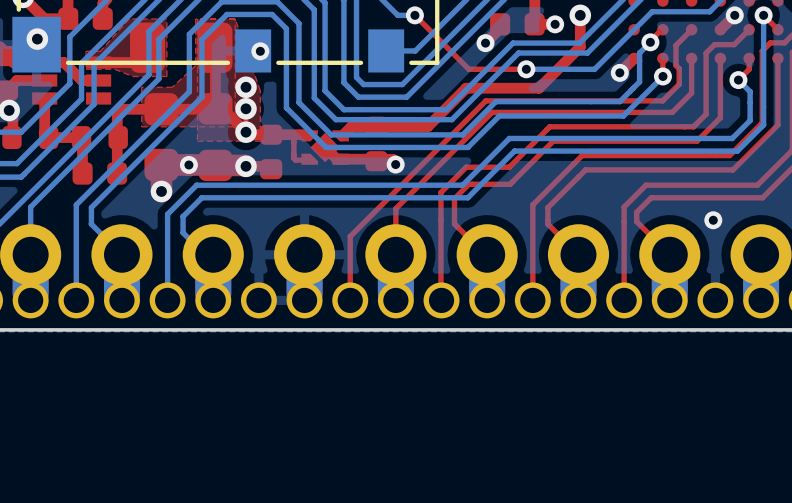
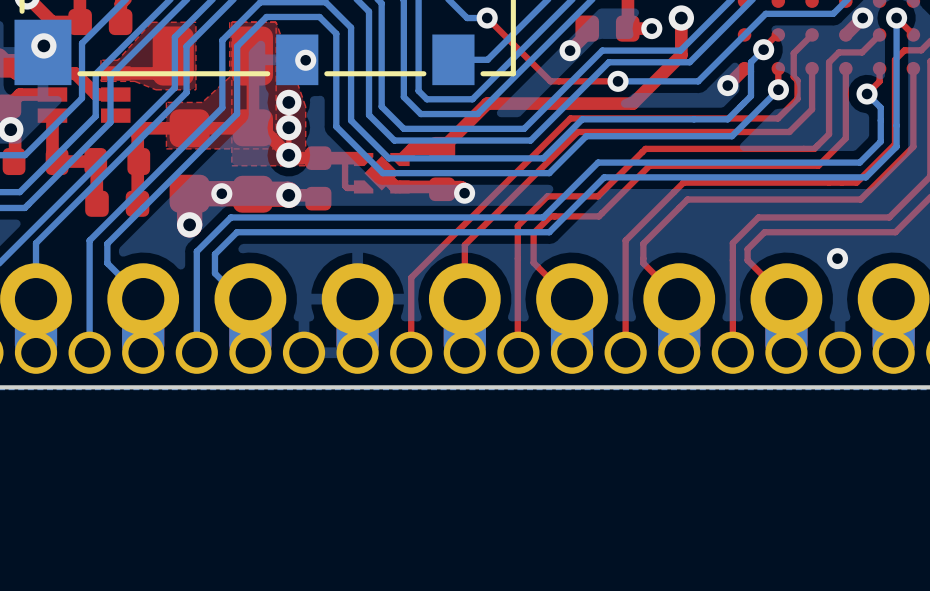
top track: (466, 88) (427, 126) (376, 126) -> (547, 103) (487, 103) (442, 148)

